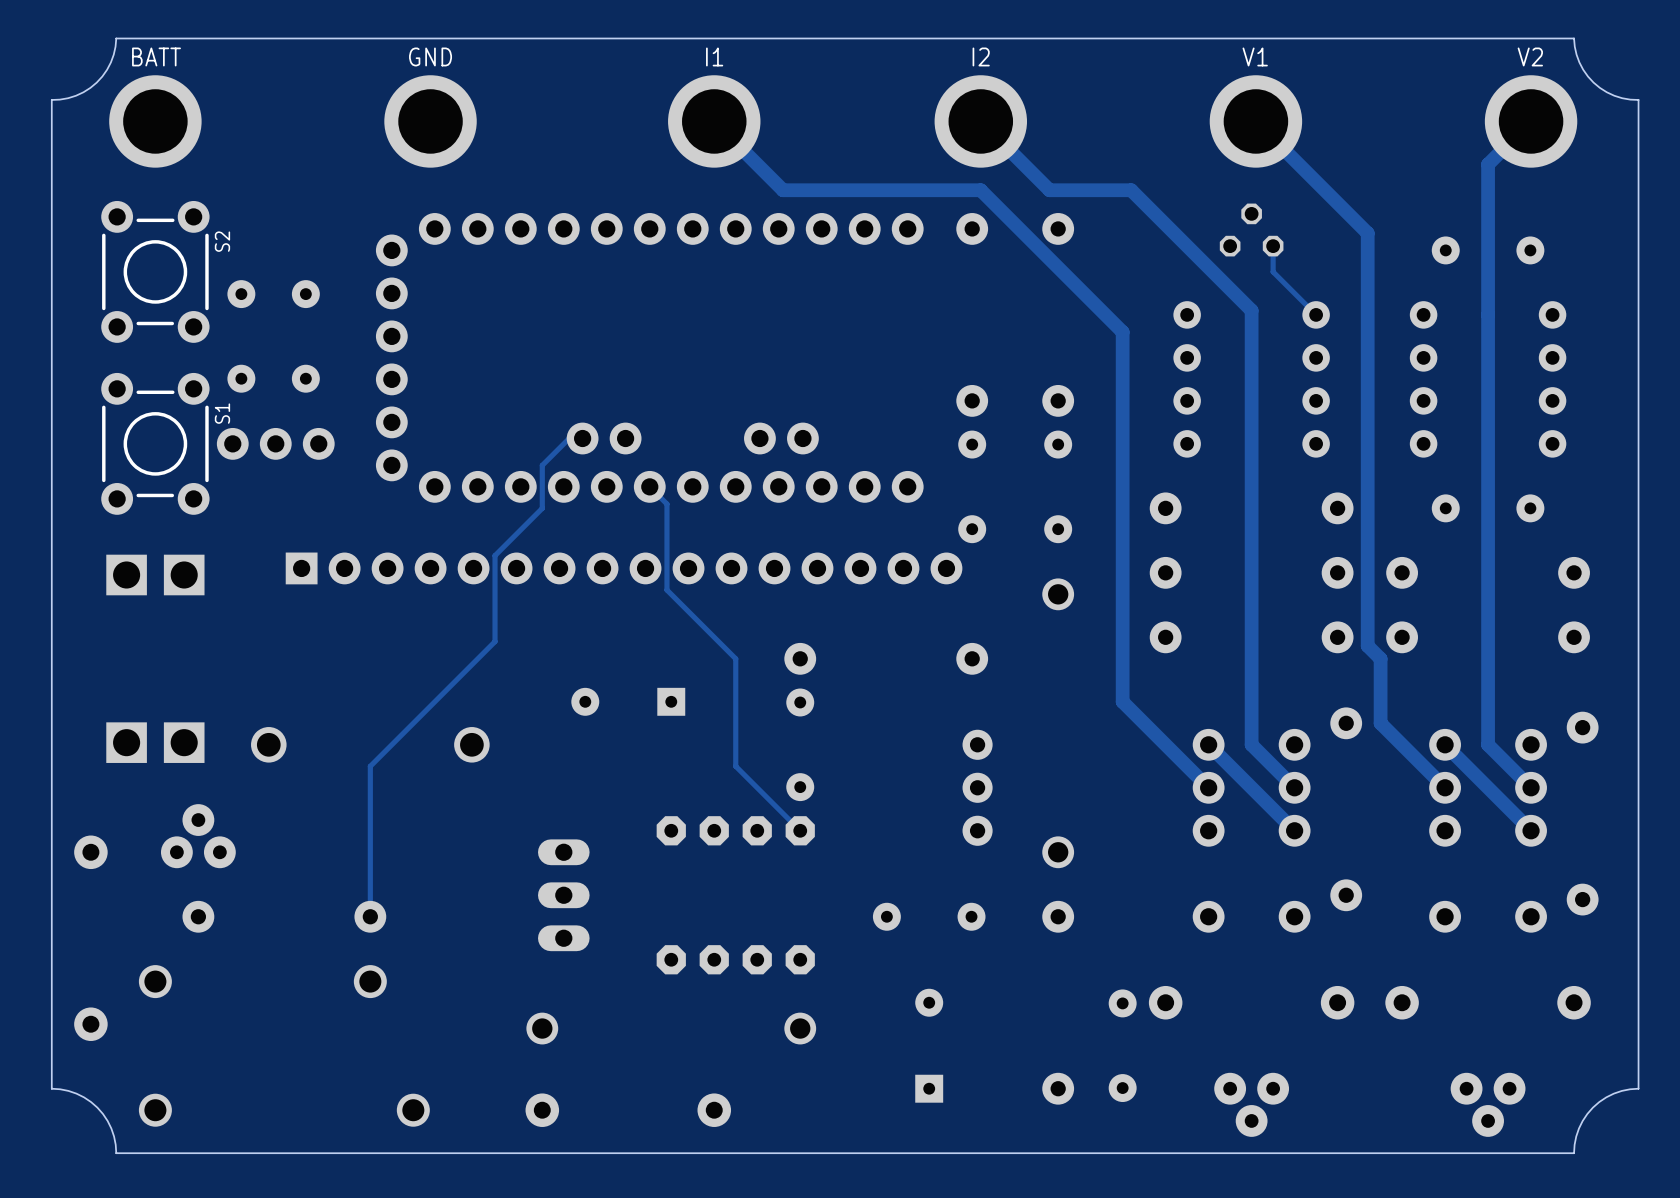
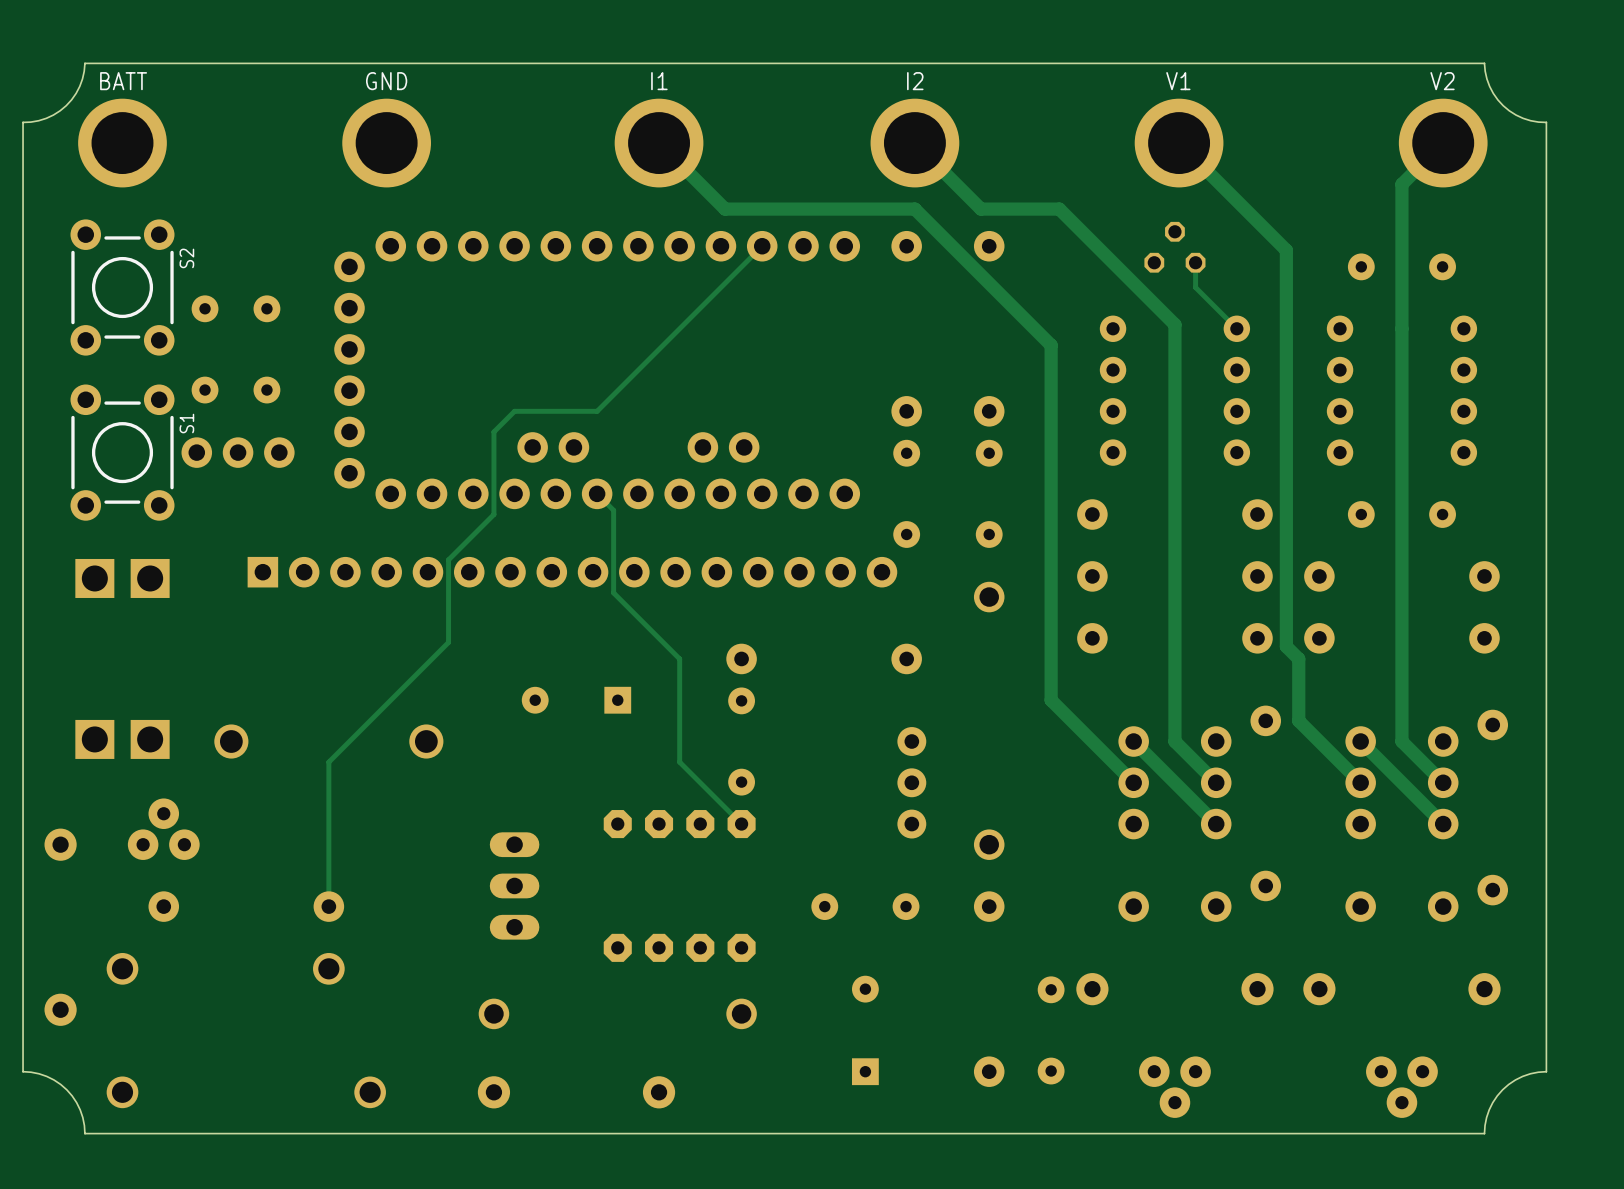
track: (582, 438) (569, 438) (542, 465) -> (762, 246) (597, 411) (514, 411) (493, 431) (493, 473)

